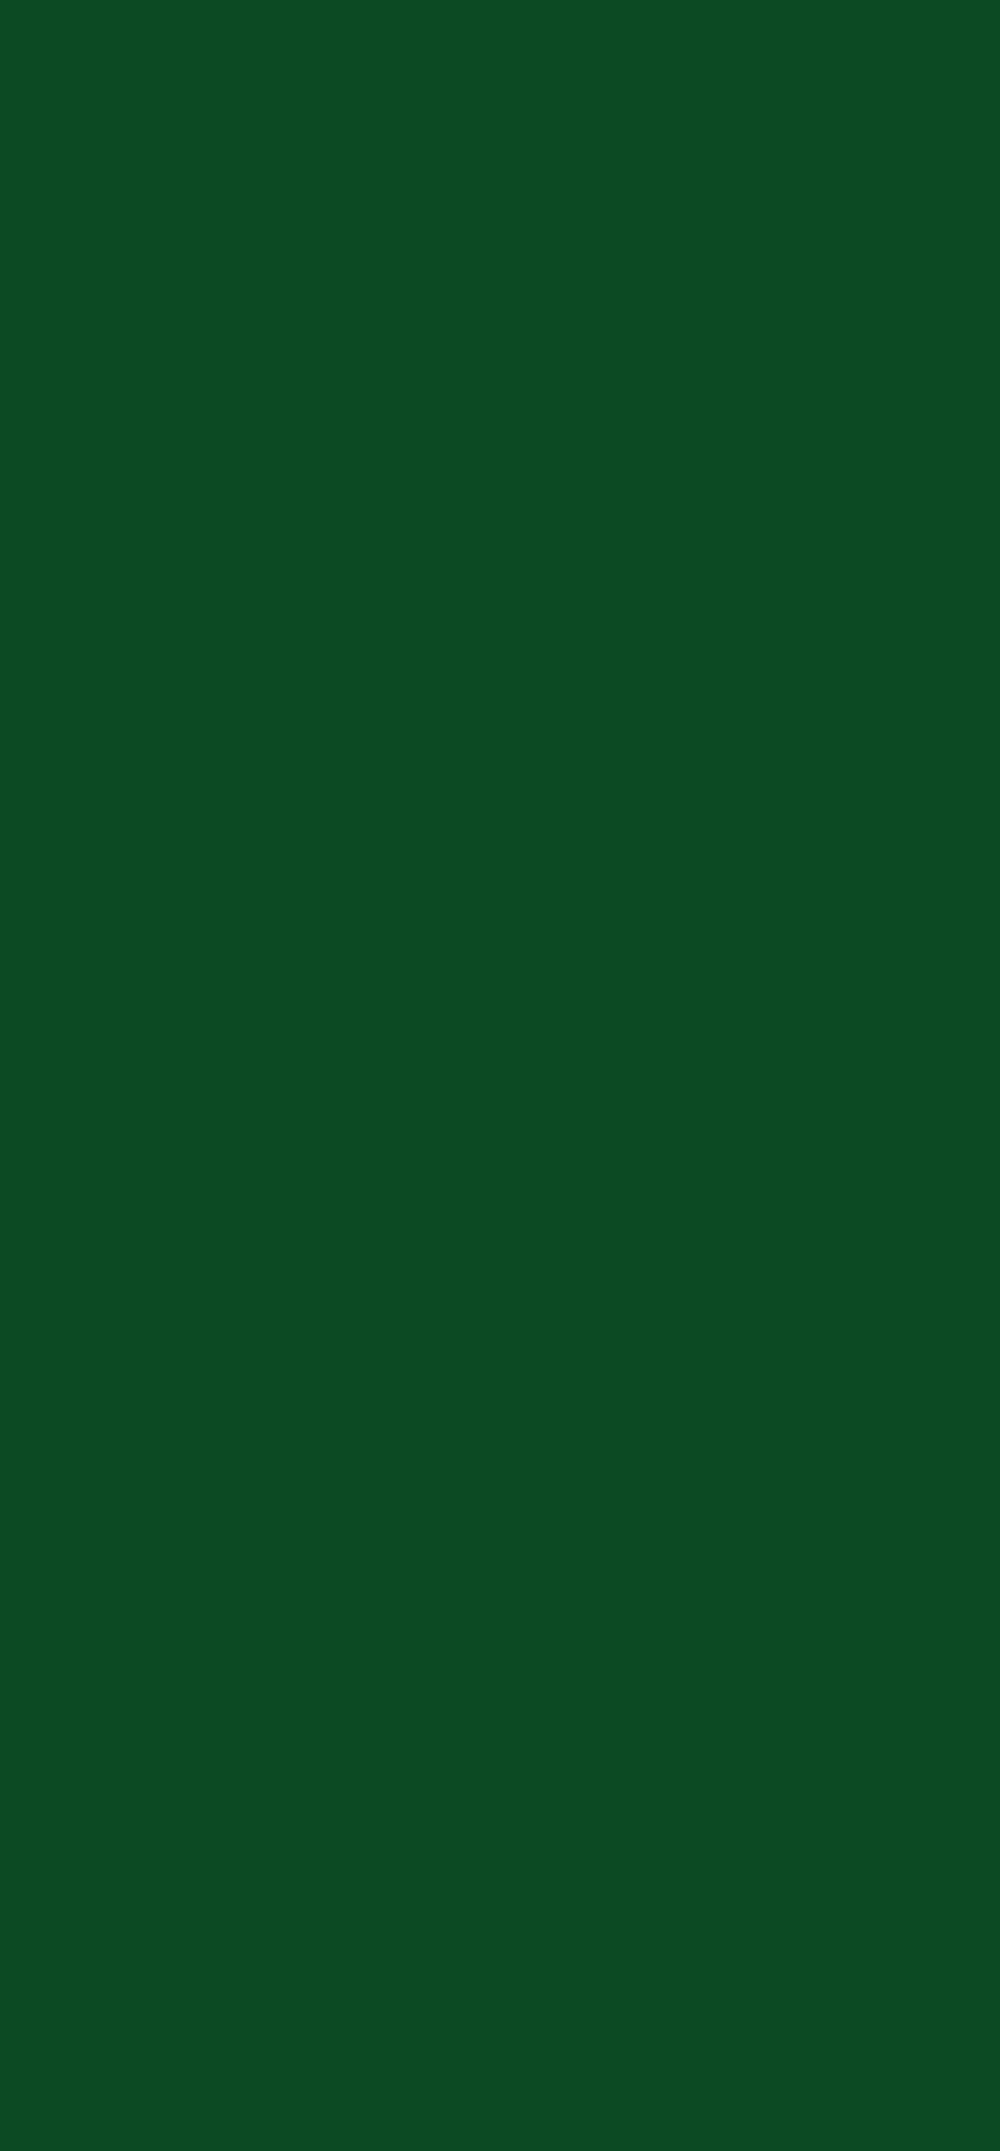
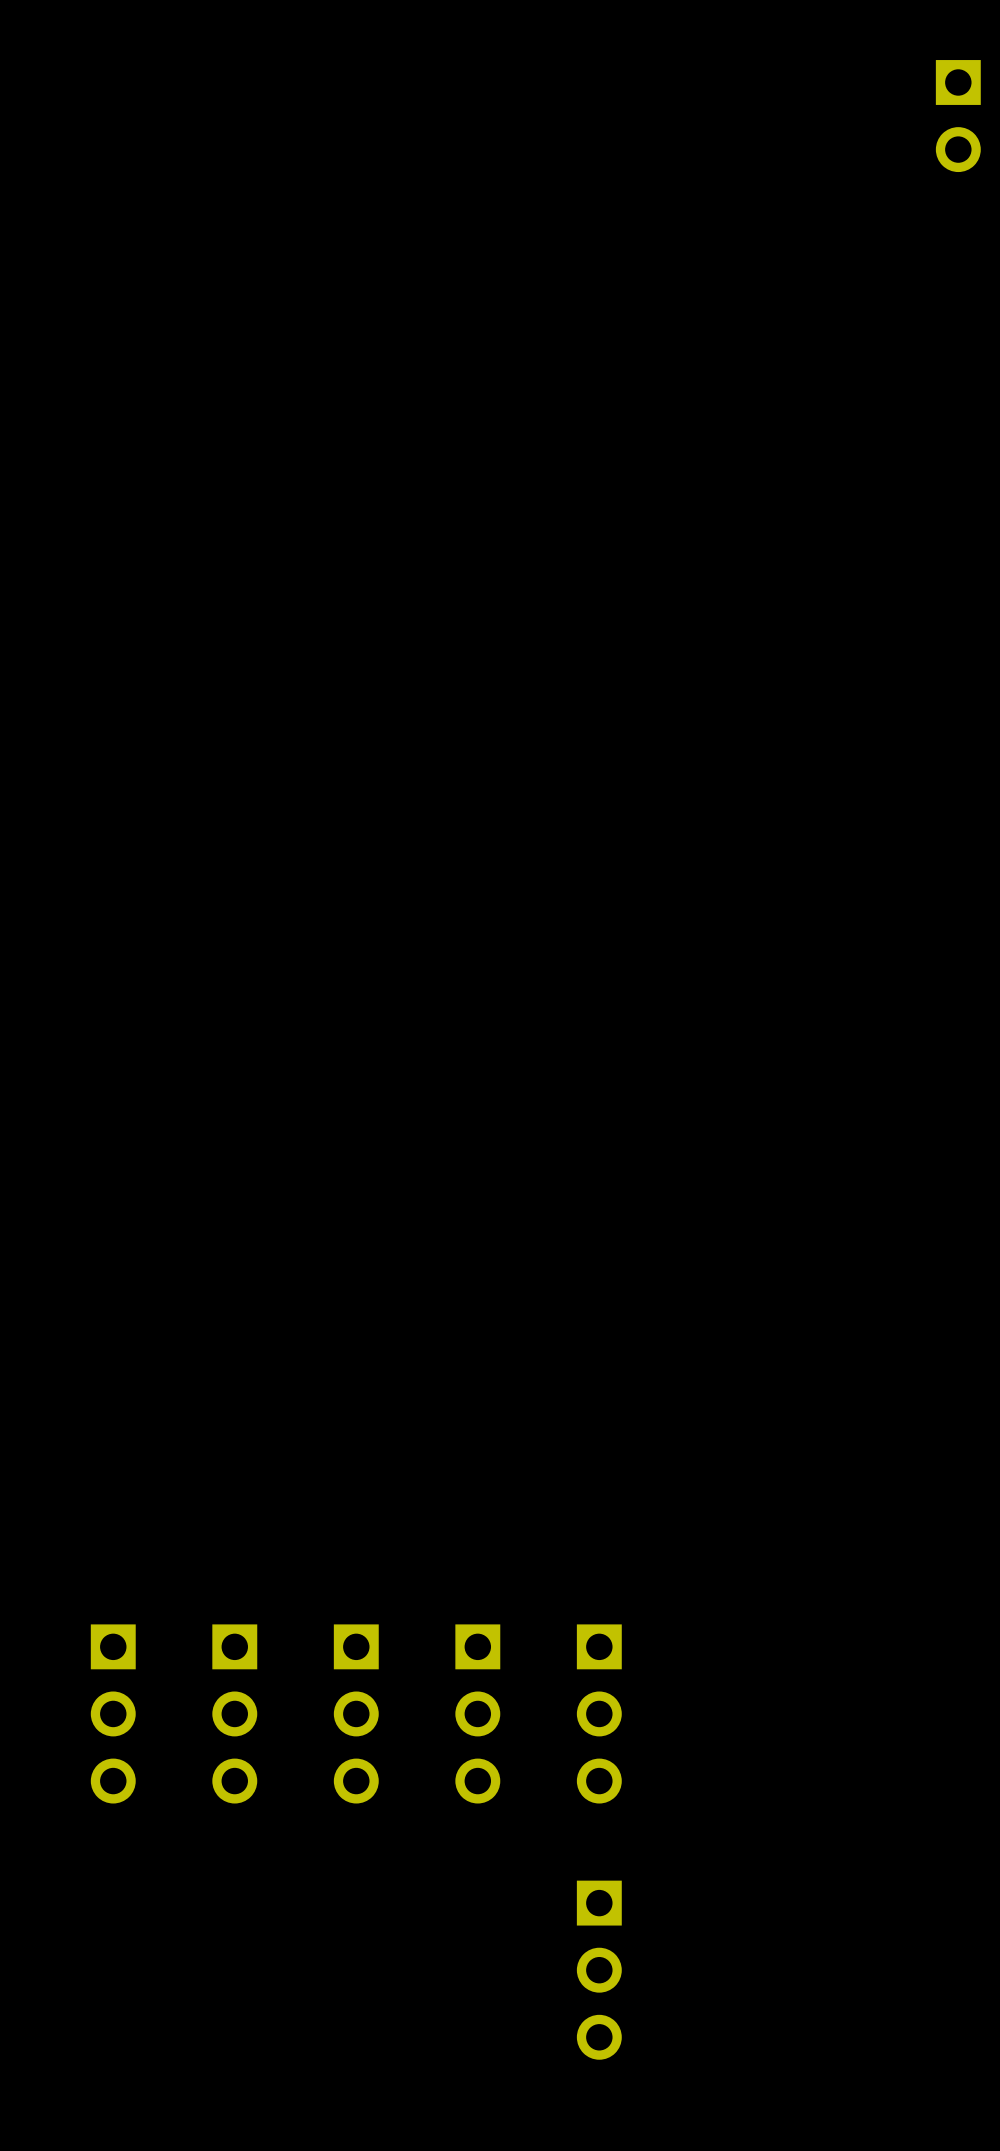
part: none -> (958, 116)
part: none -> (113, 1713)
part: none -> (234, 1713)
part: none -> (356, 1713)
part: none -> (477, 1713)
part: none -> (599, 1713)
part: none -> (599, 1970)

